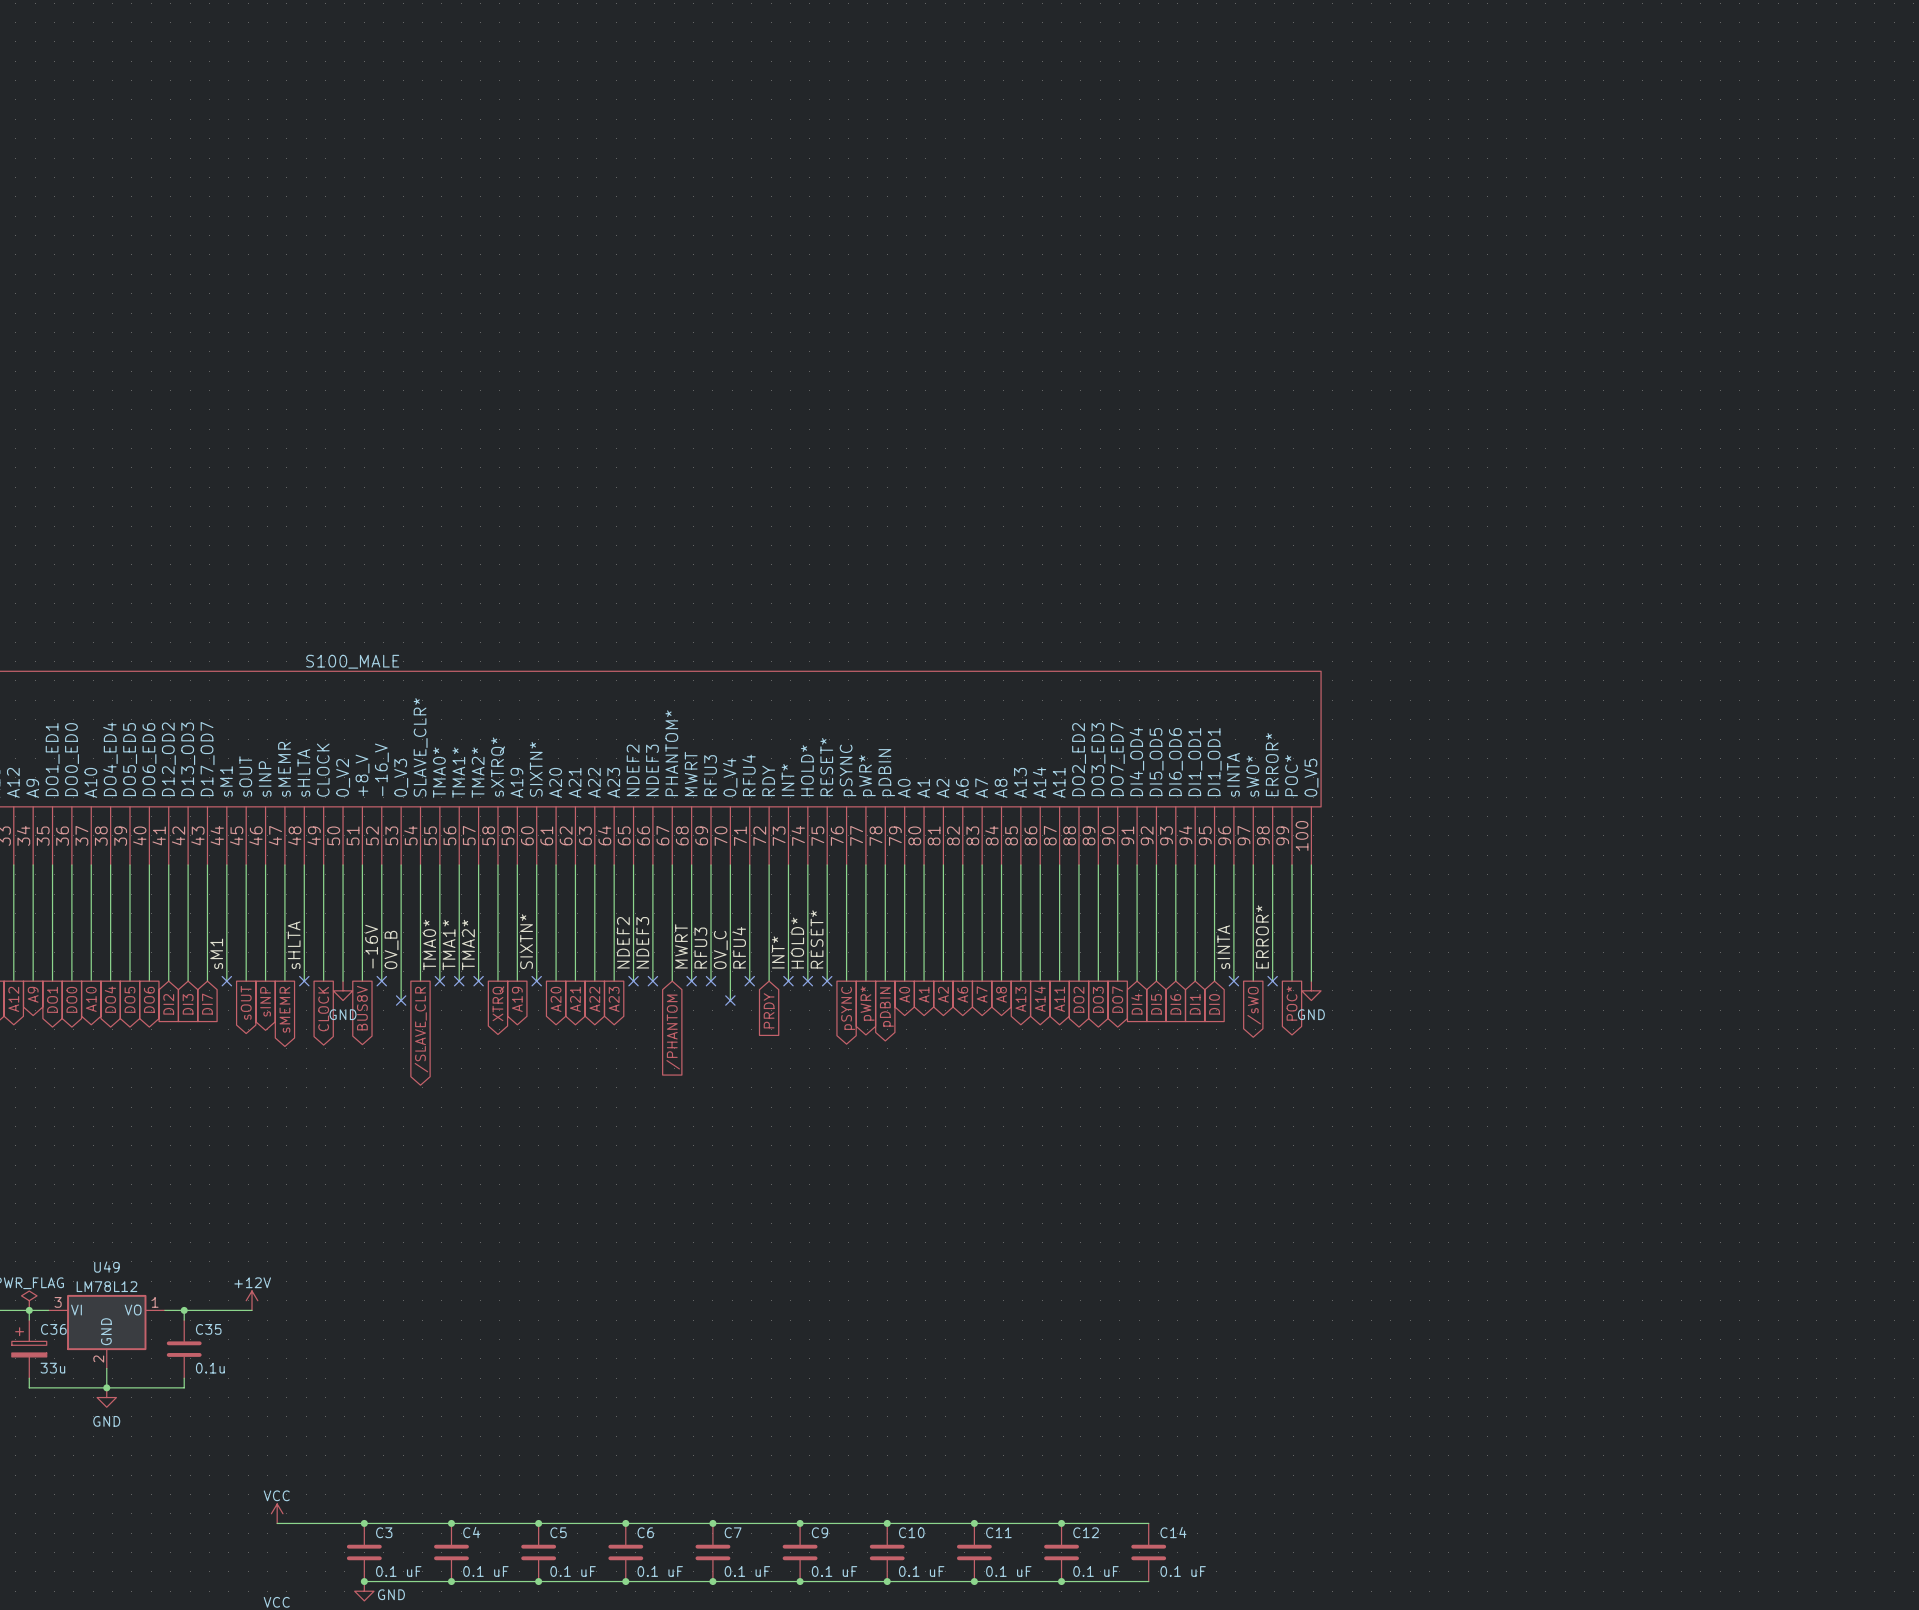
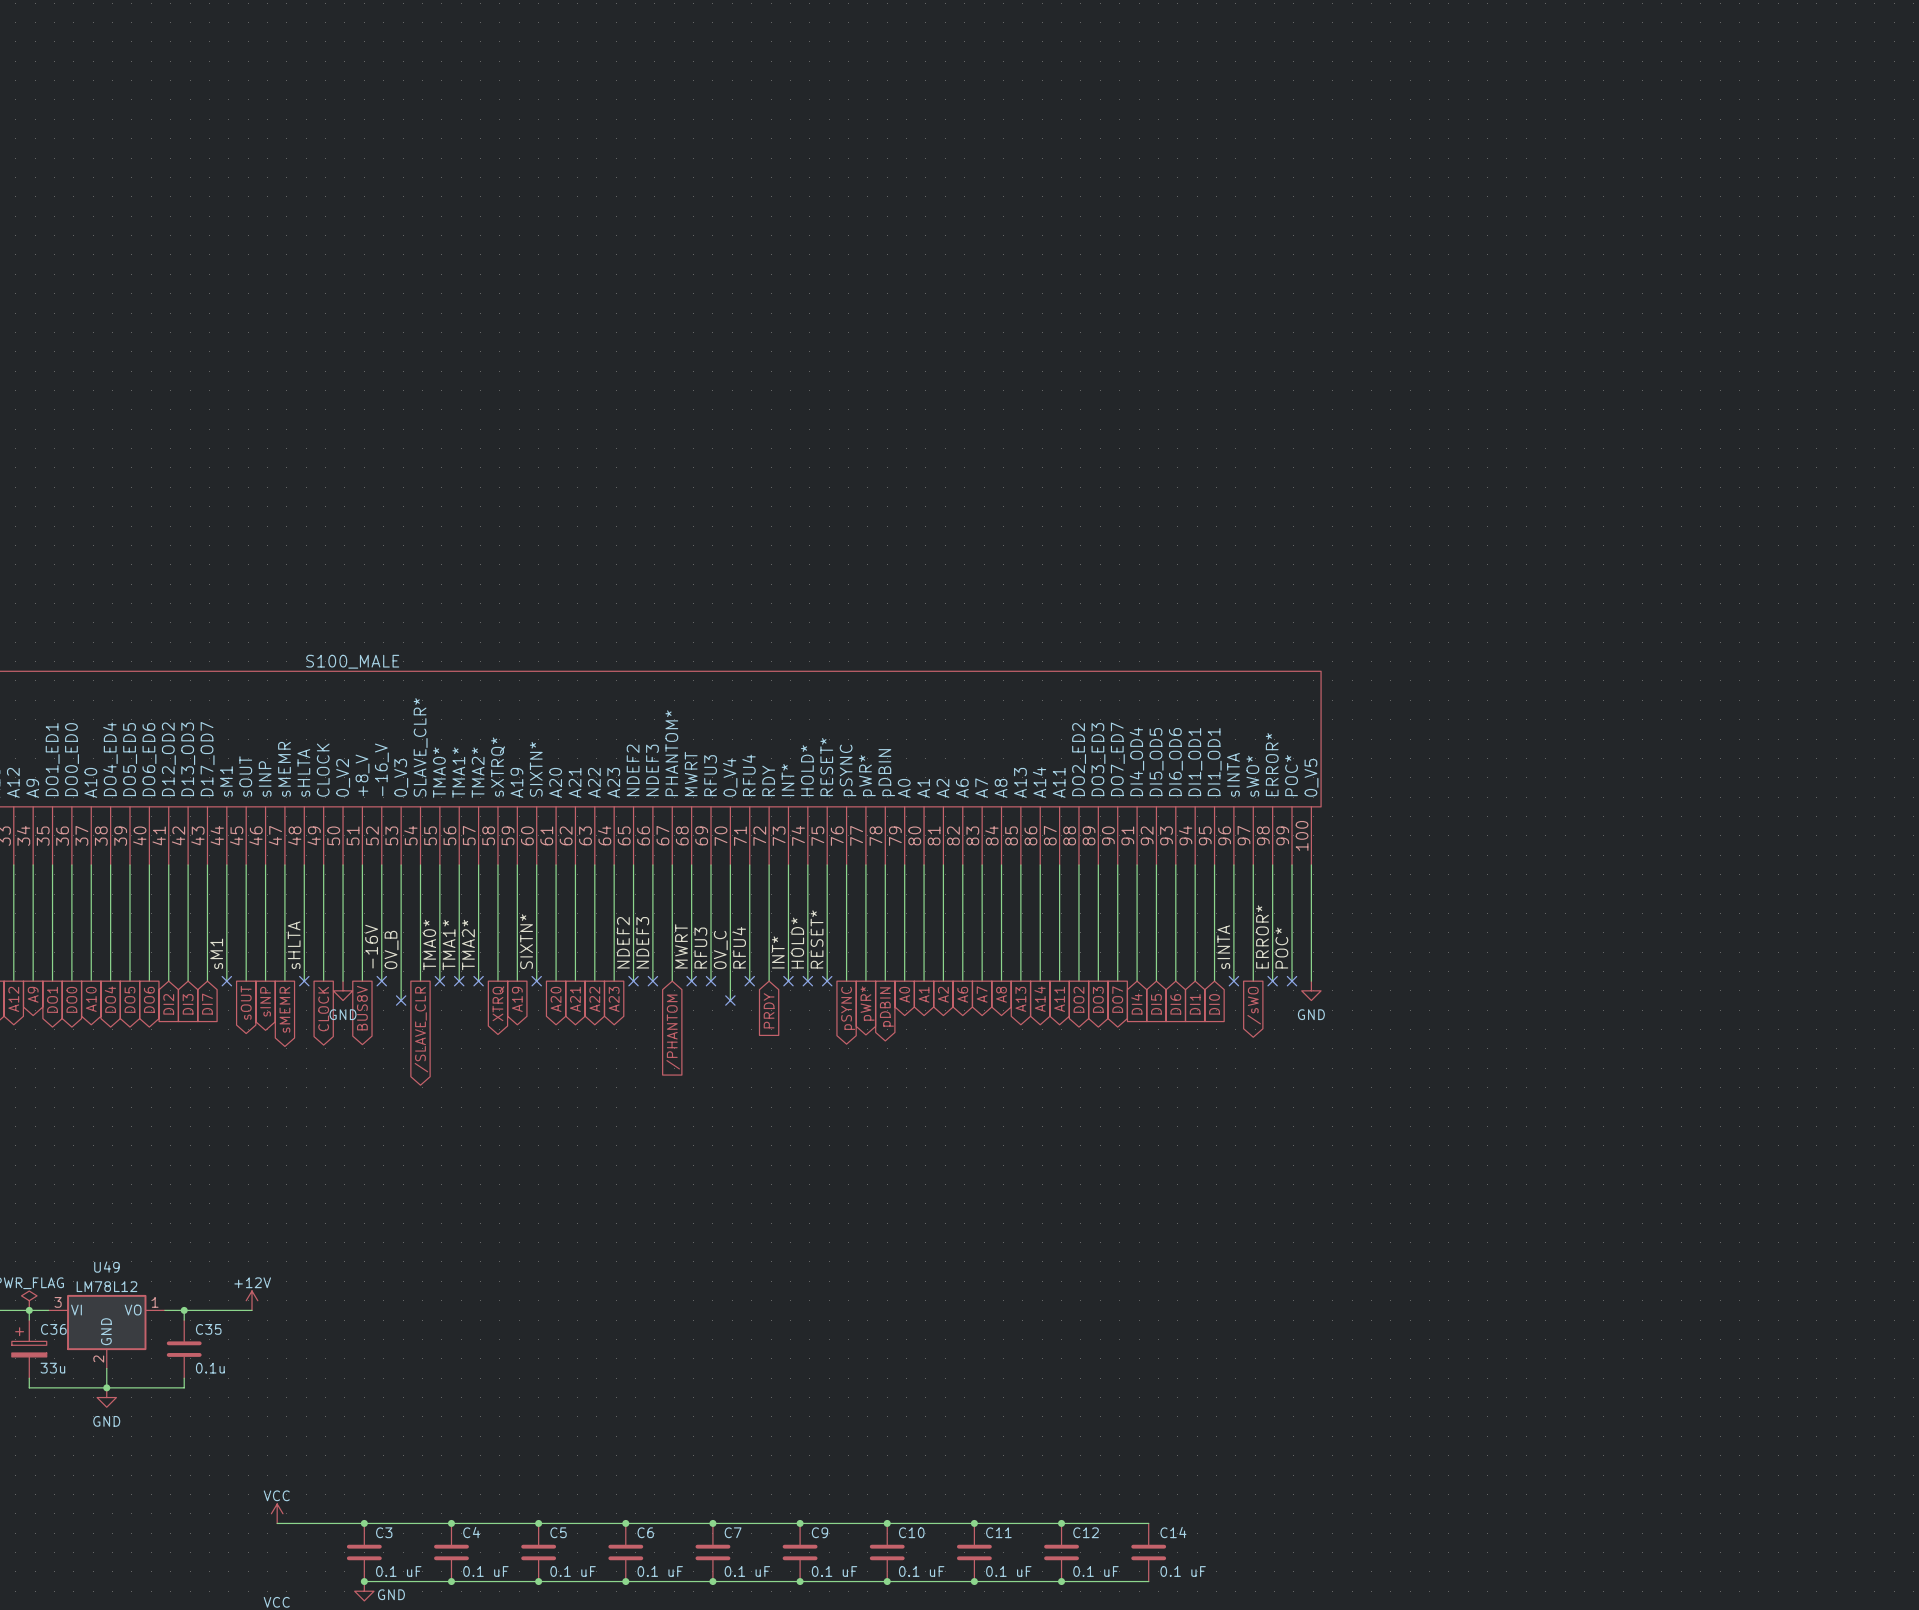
label: none -> POC* (1281, 948)
no-connect mark: none -> (1292, 981)
global label: POC* (1292, 1003) -> none

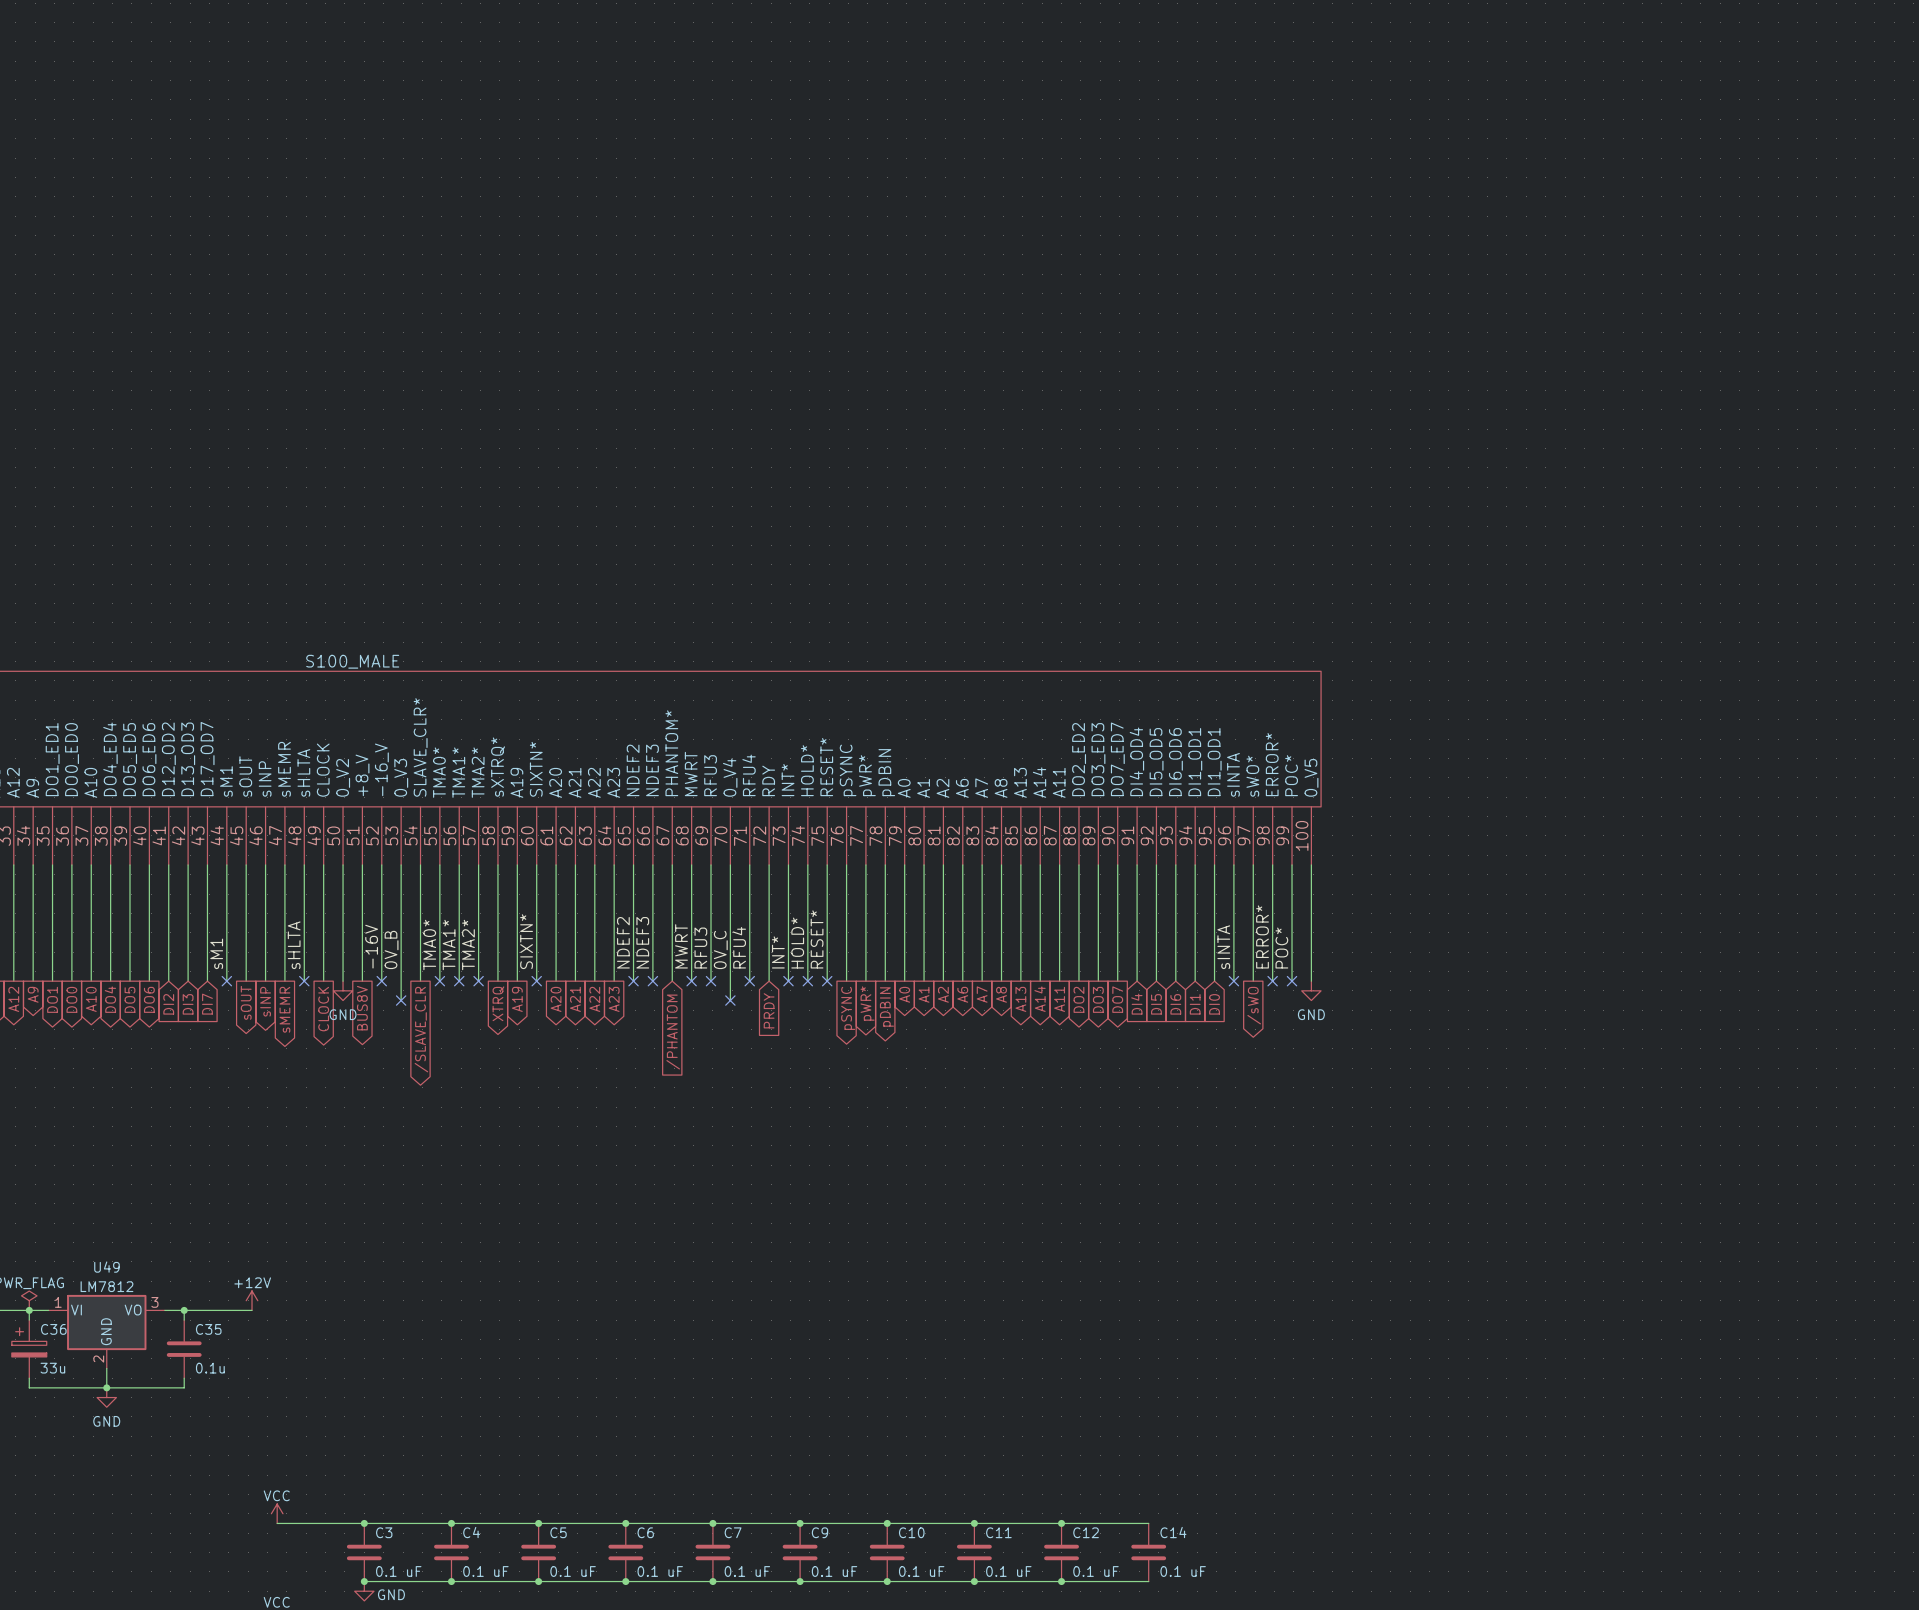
U49 value: LM78L12 (106, 1286) -> LM7812 (106, 1286)
U49 pin number: 3 (58, 1302) -> 1 (58, 1302)
U49 pin number: 1 (155, 1302) -> 3 (154, 1302)

